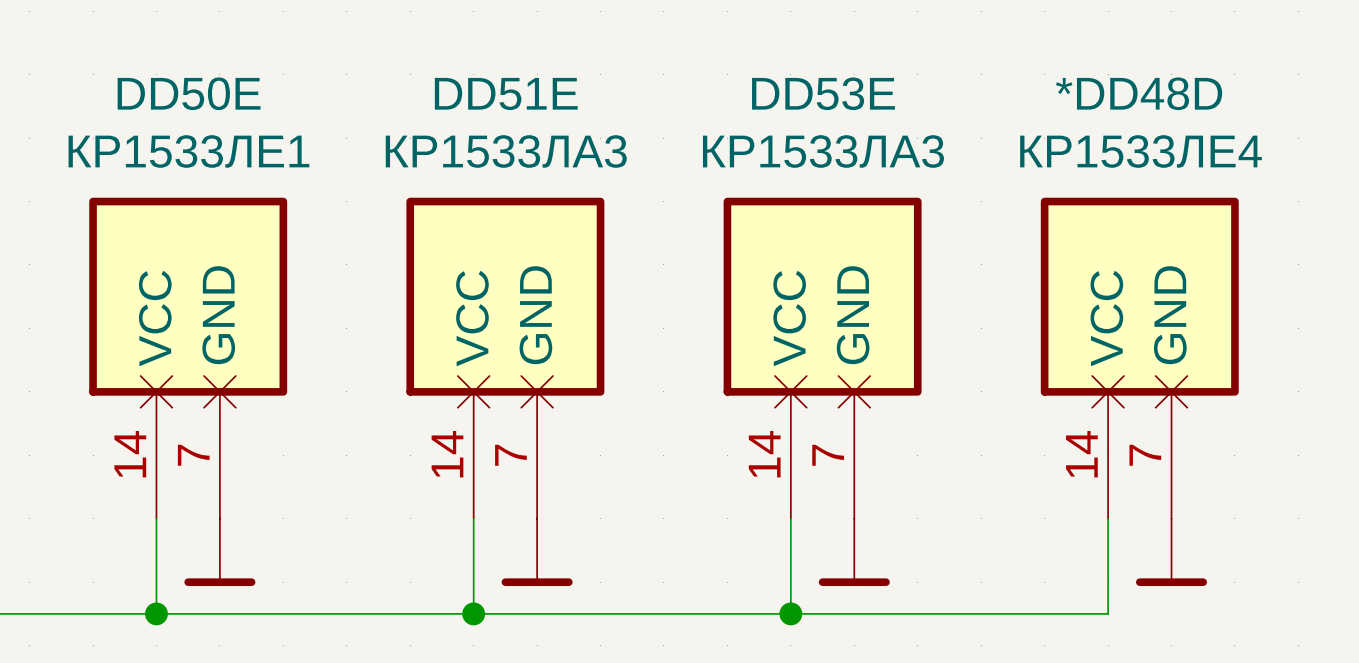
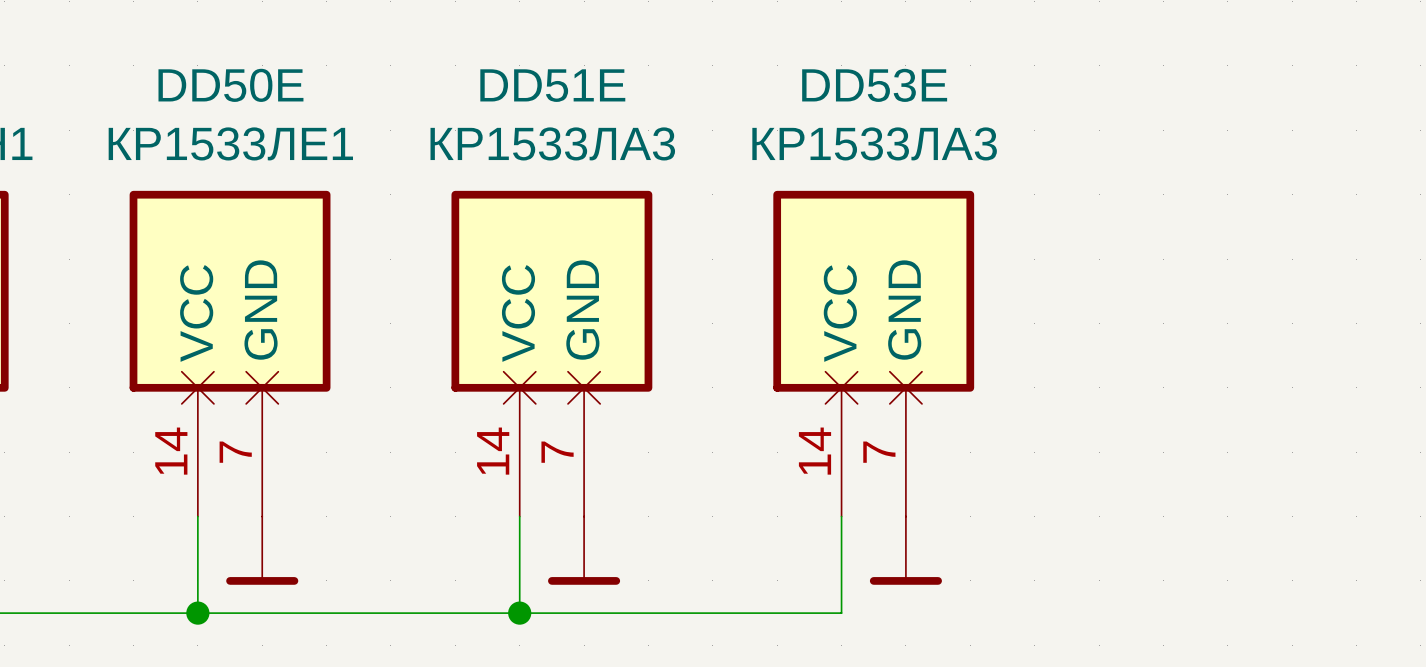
*DD48D: КР1533ЛЕ4 (1139, 358) -> none
wire: (1108, 518) (1108, 613) (790, 613) -> none
power symbol: (1171, 552) -> none
junction: (790, 613) -> none

